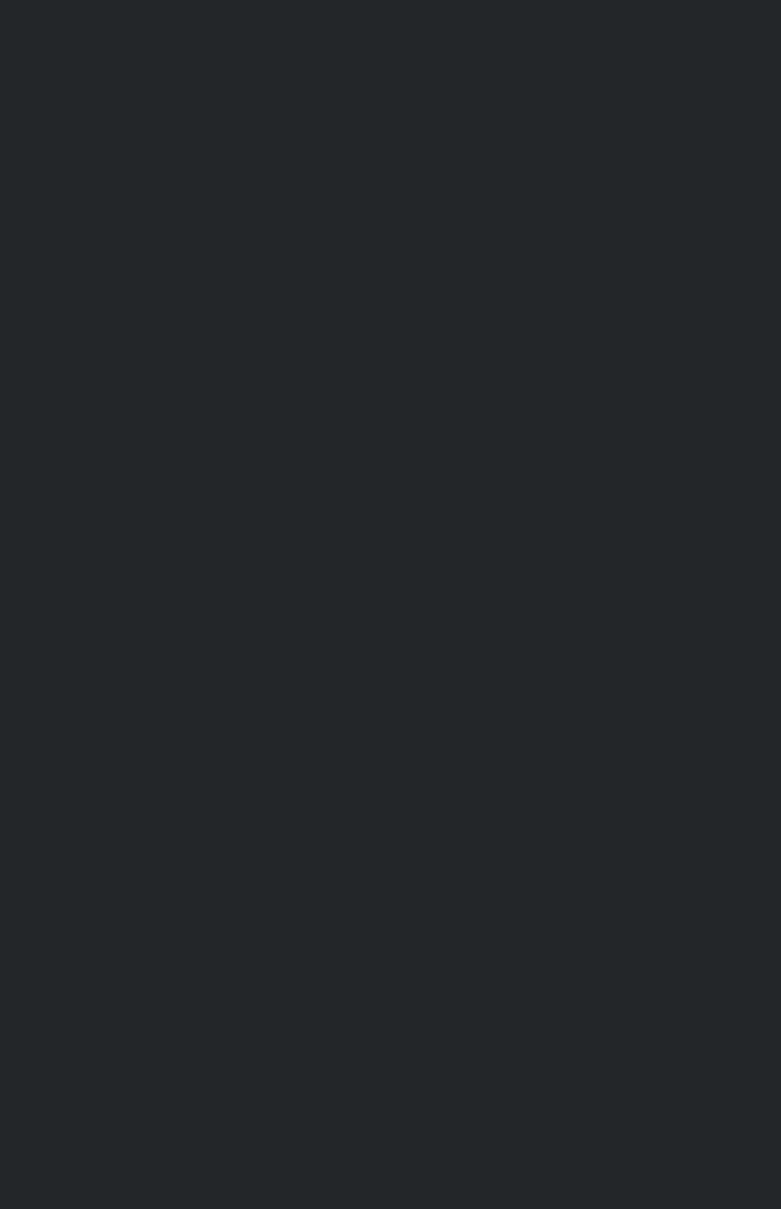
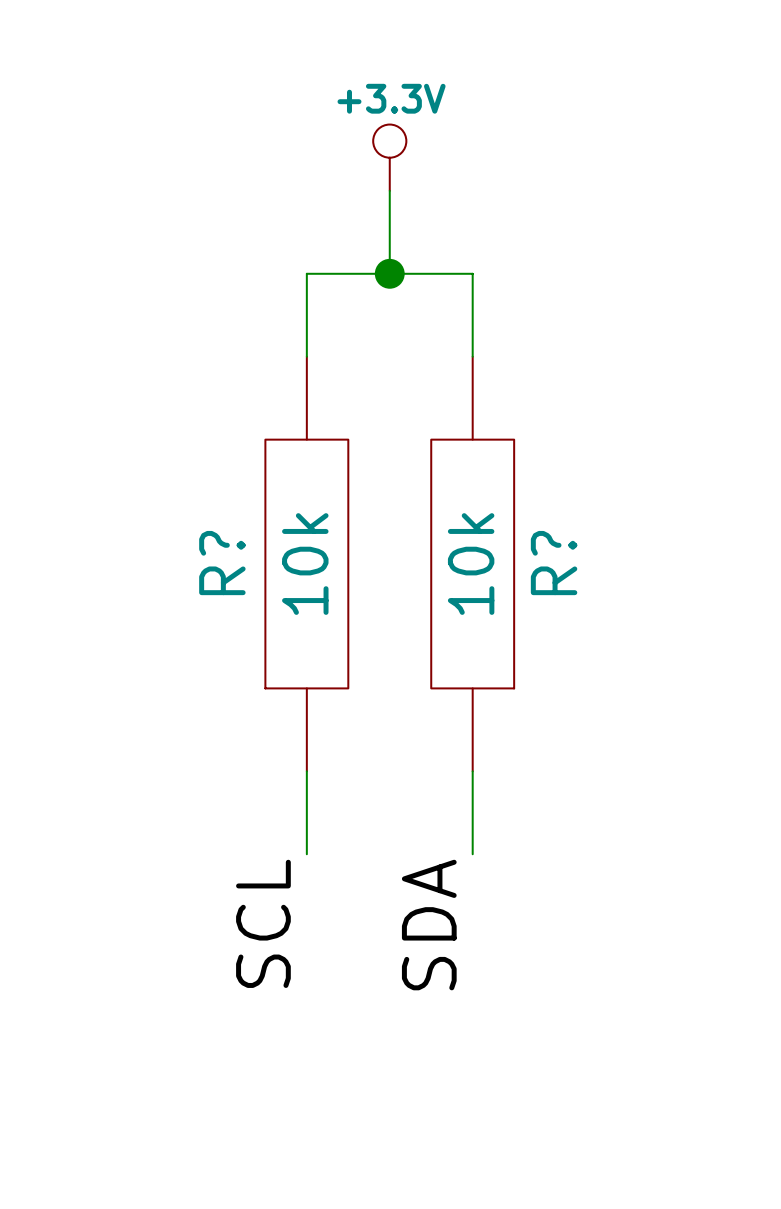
power symbol: none -> +3.3V (389, 157)
wire: none -> (389, 190) (389, 273)
junction: none -> (389, 273)
wire: none -> (306, 356) (306, 273) (472, 273) (472, 356)
R?: none -> 10k (306, 564)
R?: none -> 10k (472, 564)
wire: none -> (306, 771) (306, 854)
wire: none -> (472, 771) (472, 854)
label: none -> SCL (263, 923)
label: none -> SDA (429, 925)

